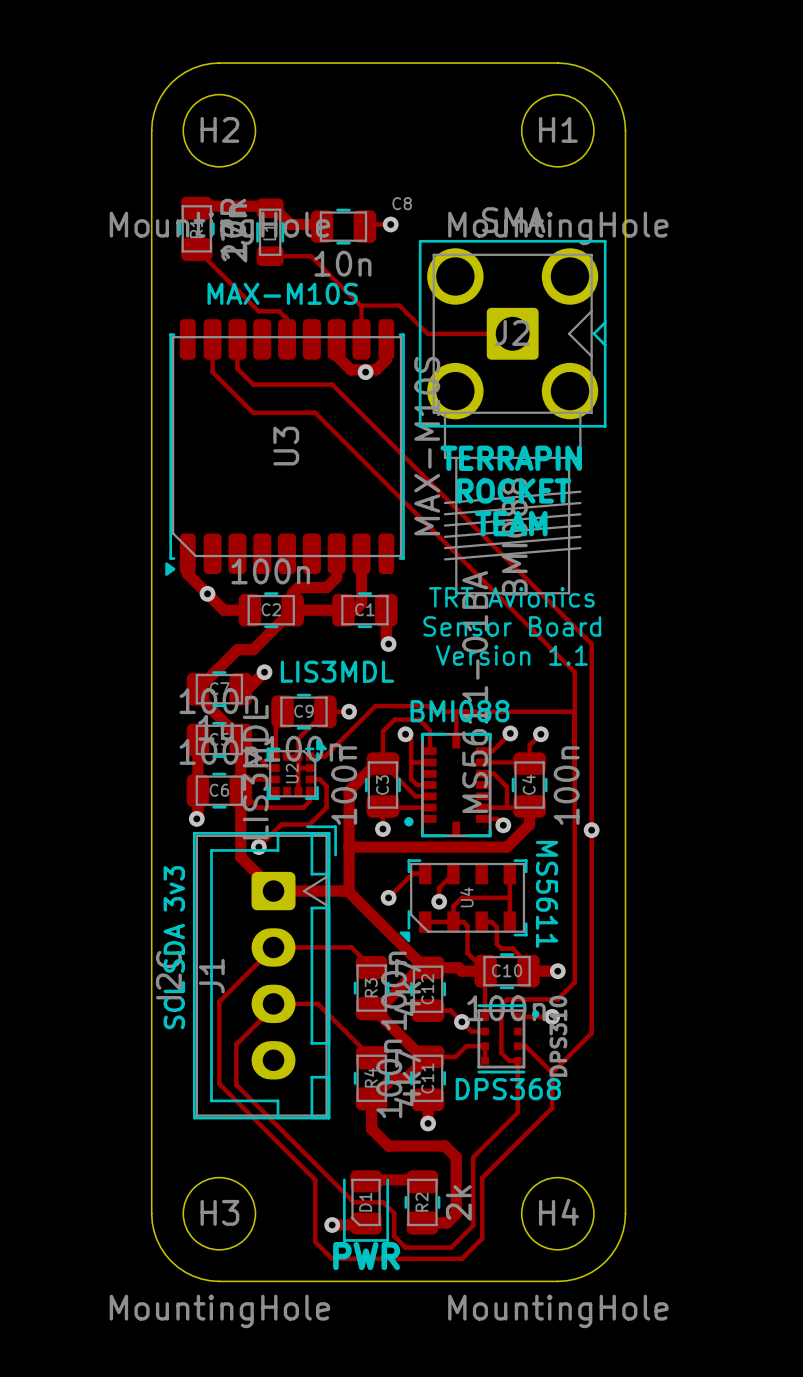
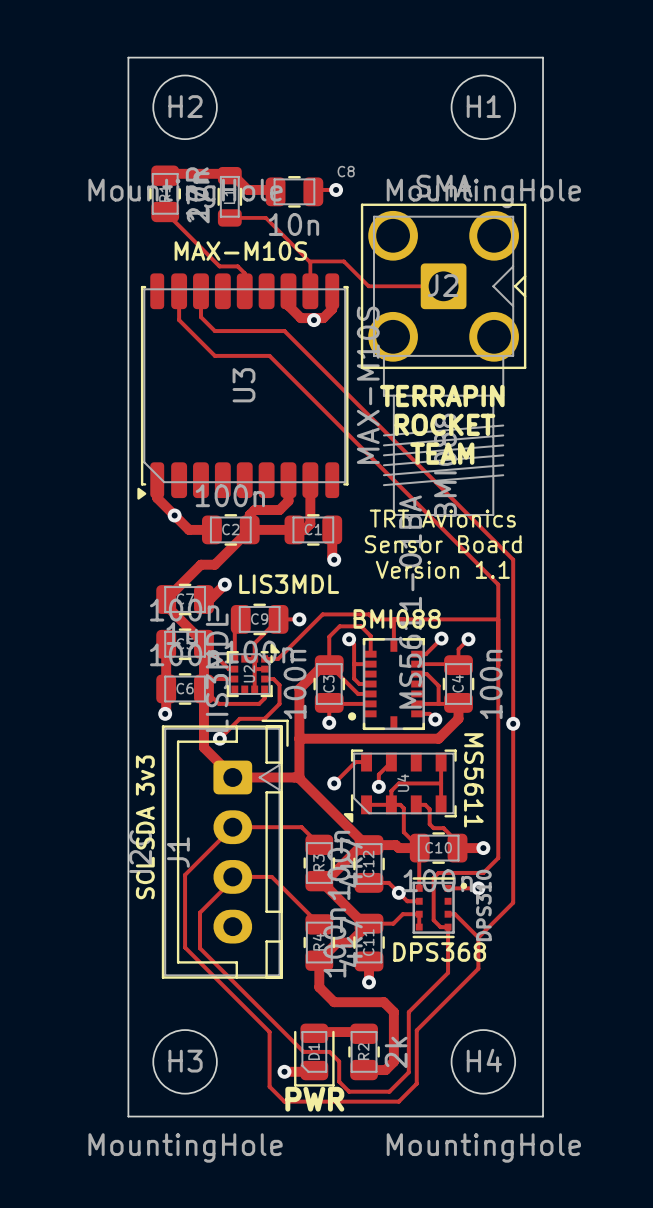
board edge: (625, 130) (620, 104) (605, 82) (583, 68) (557, 63) (210, 63) (193, 68) (171, 82) (156, 104) (151, 130) (151, 1213) (156, 1239) (165, 1254) (178, 1267) (193, 1276) (210, 1280) (557, 1281) (583, 1276) (605, 1261) (620, 1239) (625, 1213) -> (543, 107) (543, 57) (128, 57) (128, 1116) (543, 1116) (543, 1061)

